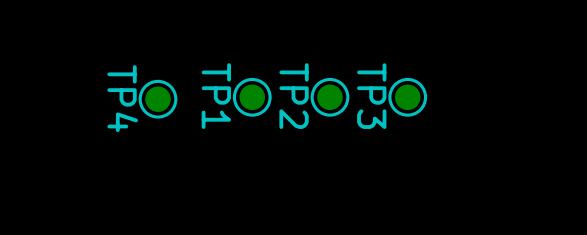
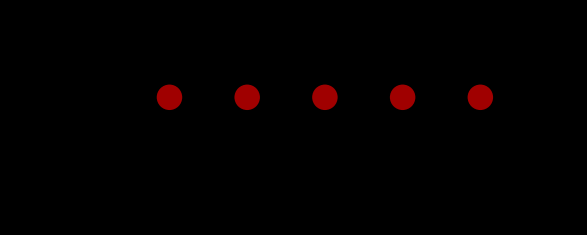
part: none -> (169, 97)
TP1 side: bottom (252, 97) -> top (480, 97)
TP2 side: bottom (330, 97) -> top (402, 97)
TP3 side: bottom (407, 97) -> top (324, 97)
TP4 side: bottom (157, 99) -> top (247, 97)

